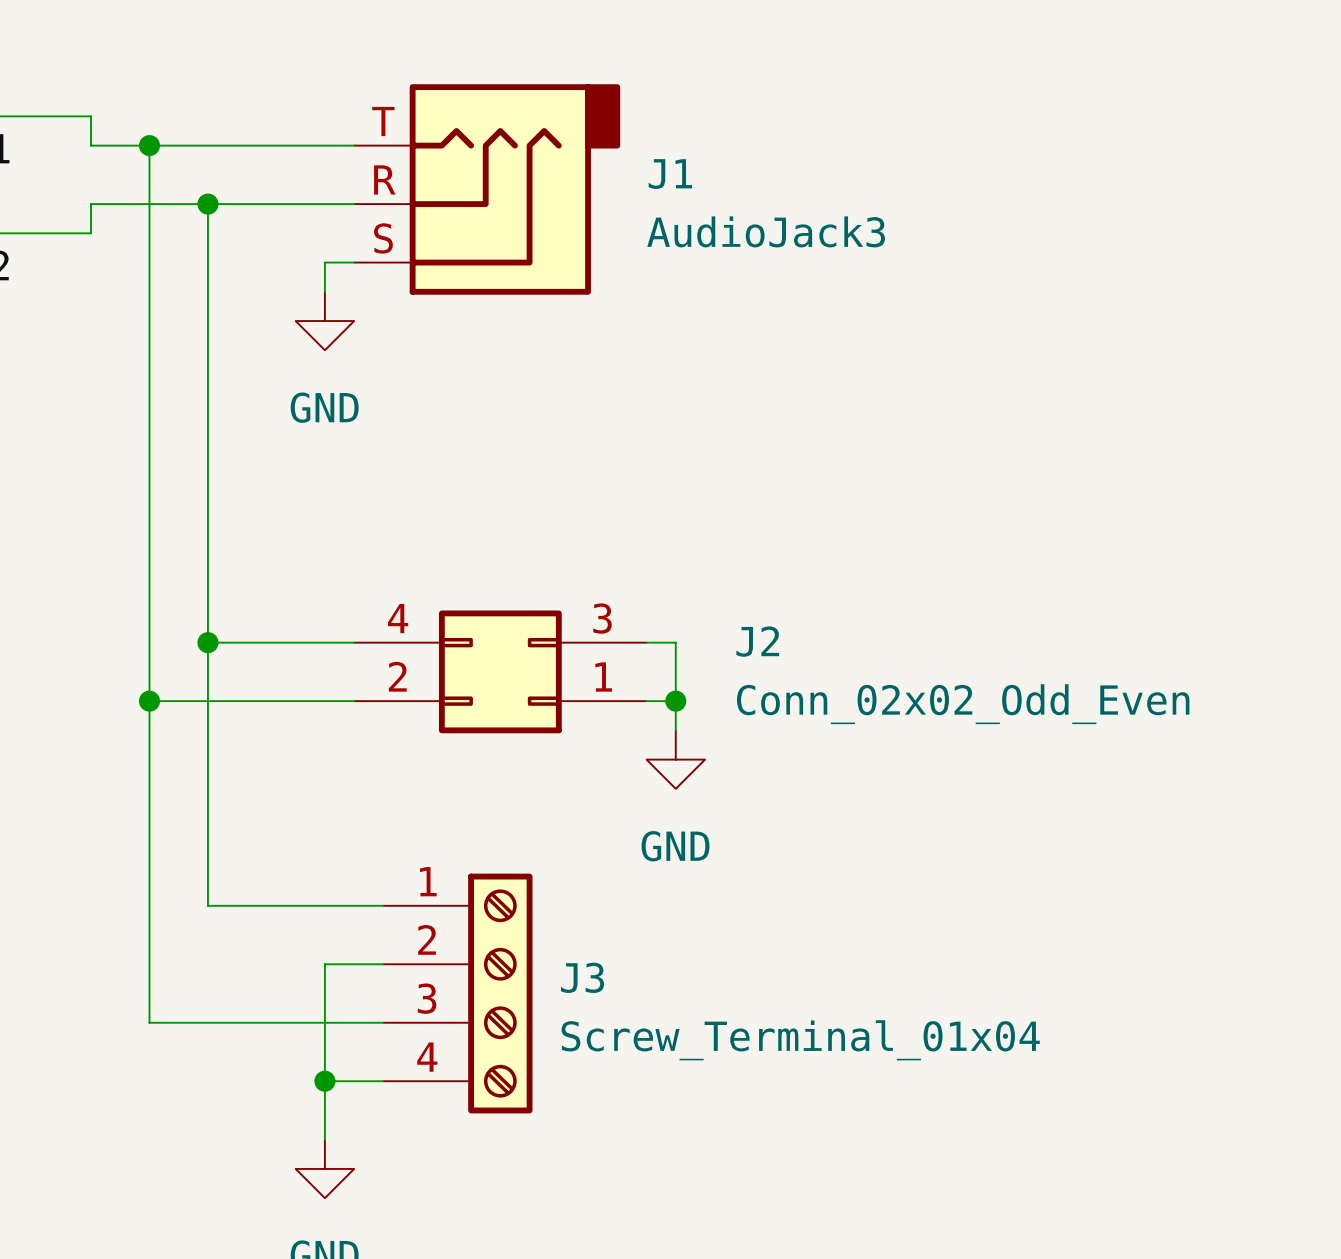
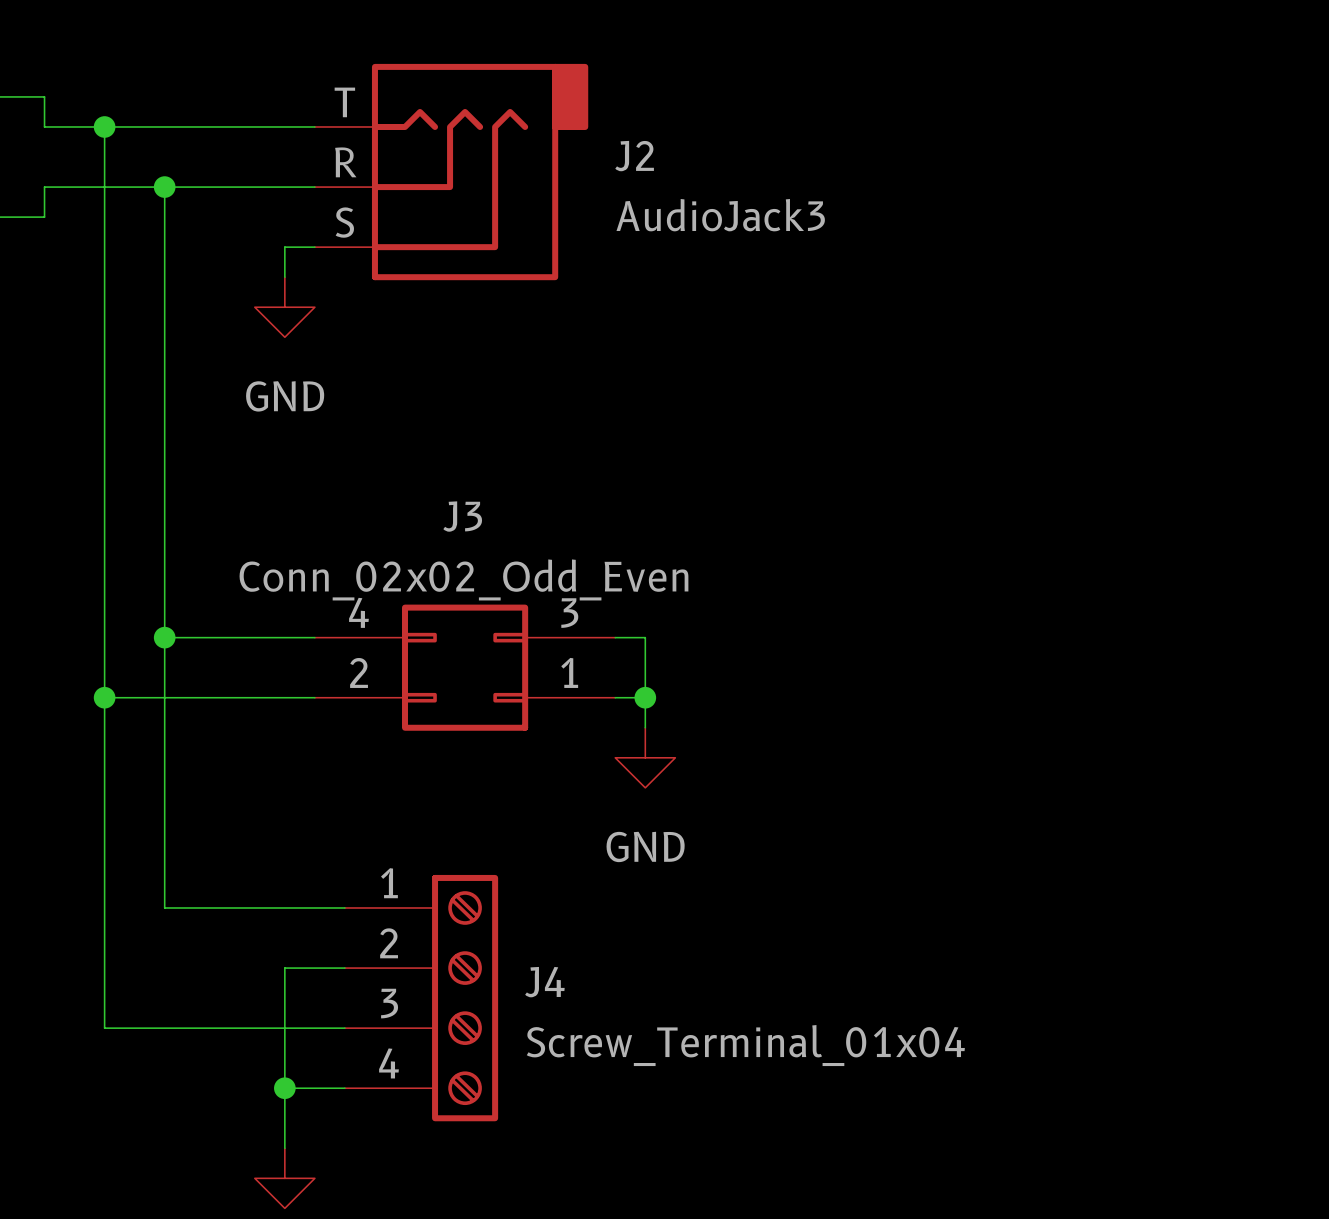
J1 name: J1 (670, 174) -> J2 (634, 156)
J2 name: J2 (757, 641) -> J3 (462, 516)
J2 value position: Conn_02x02_Odd_Even (963, 704) -> Conn_02x02_Odd_Even (463, 579)
J3 name: J3 (582, 977) -> J4 (544, 982)

